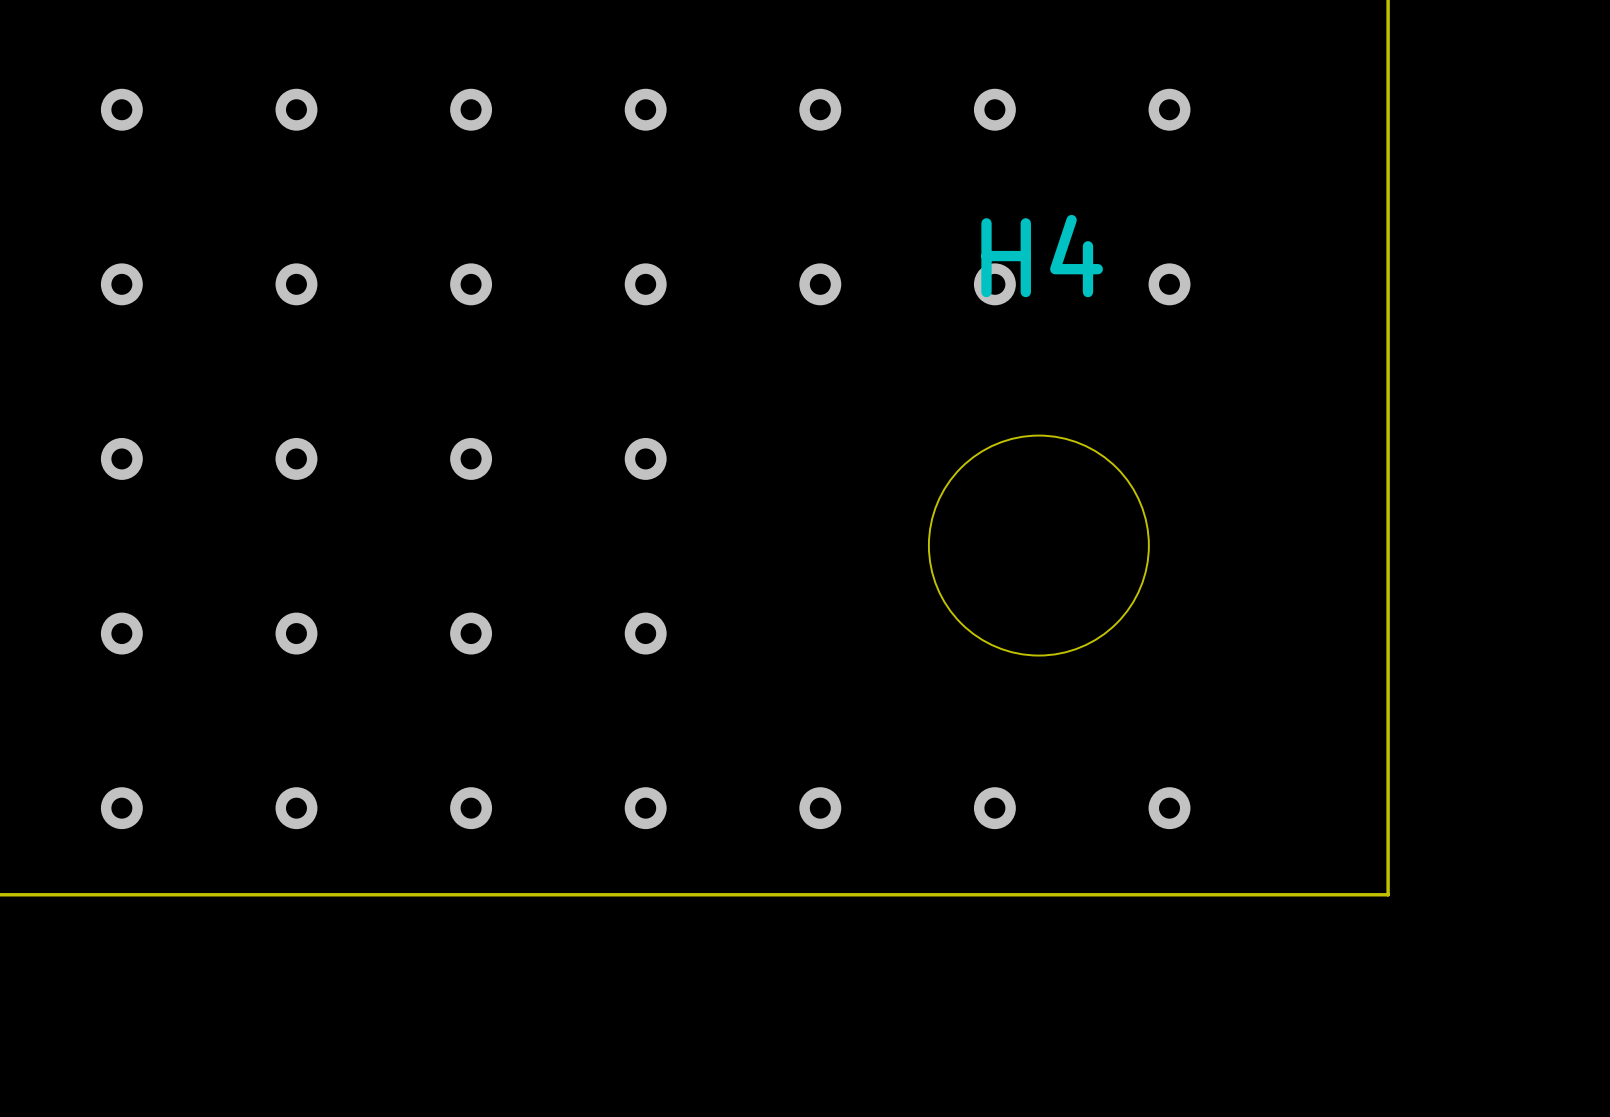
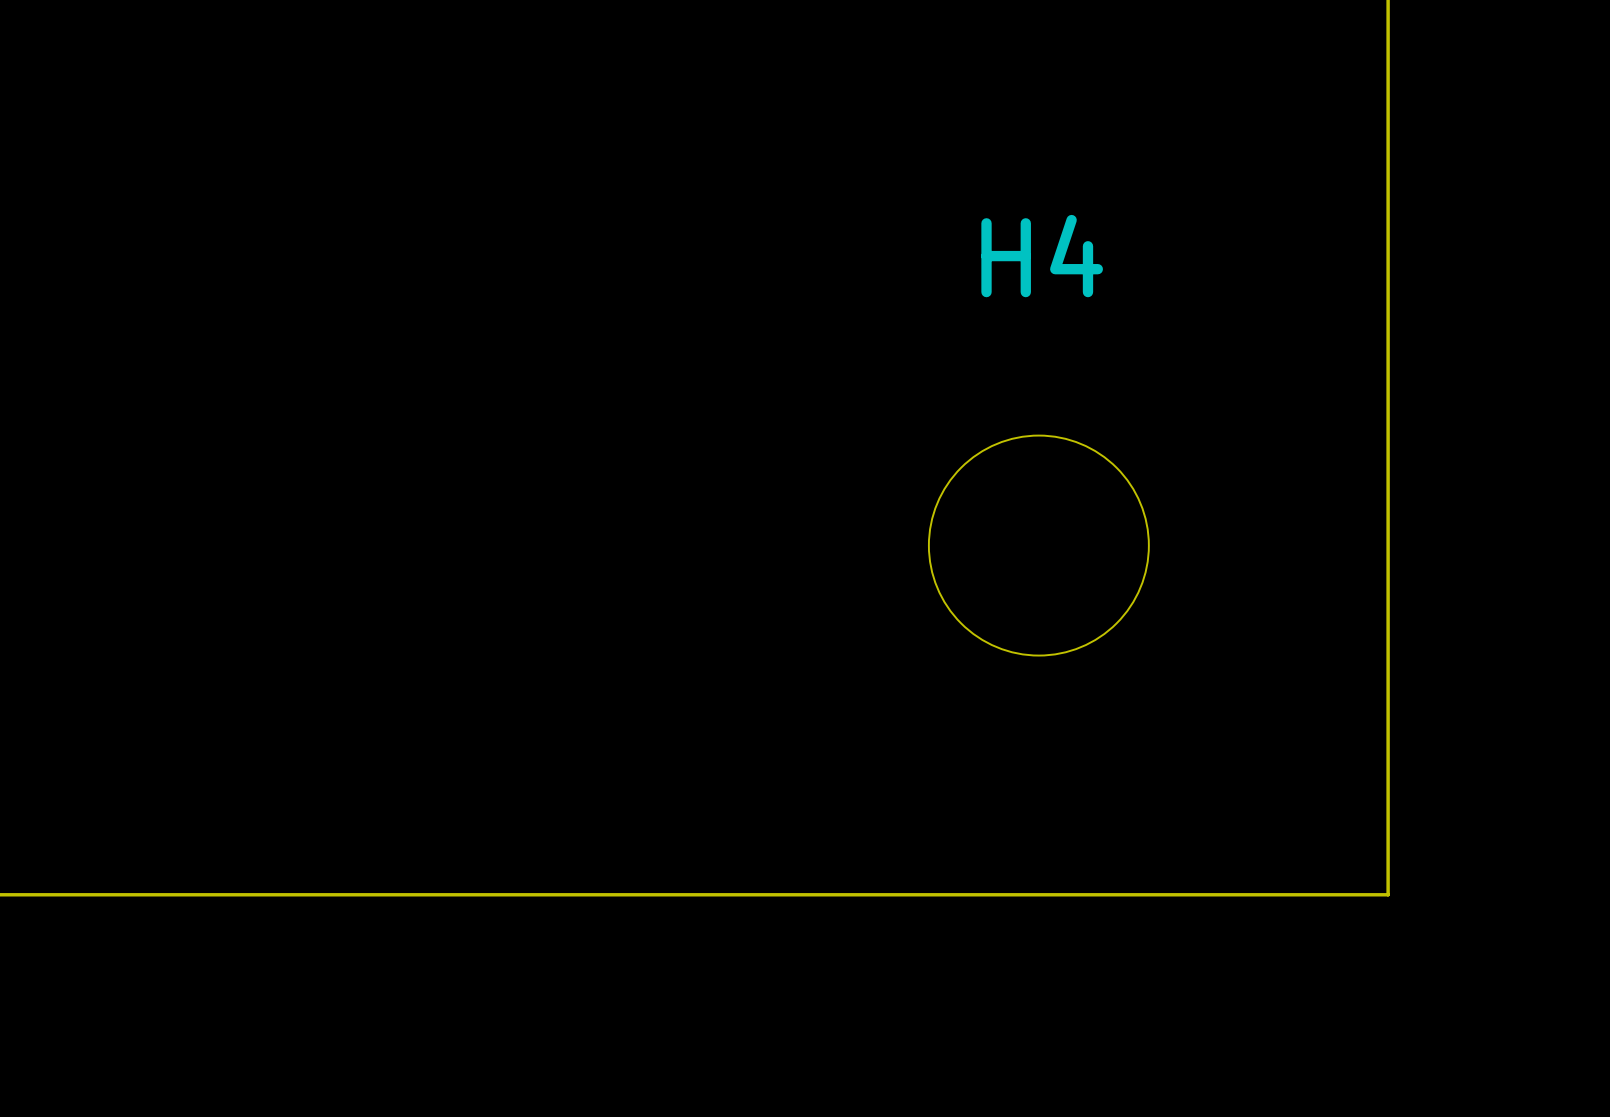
via: (121, 109) -> none
via: (296, 109) -> none
via: (471, 109) -> none
via: (645, 109) -> none
via: (820, 109) -> none
via: (994, 109) -> none
via: (1169, 109) -> none
via: (121, 284) -> none
via: (296, 284) -> none
via: (471, 284) -> none
via: (645, 284) -> none
via: (820, 284) -> none
via: (994, 284) -> none
via: (1169, 284) -> none
via: (121, 458) -> none
via: (296, 458) -> none
via: (471, 458) -> none
via: (645, 458) -> none
via: (121, 633) -> none
via: (296, 633) -> none
via: (471, 633) -> none
via: (645, 633) -> none
via: (121, 808) -> none
via: (296, 808) -> none
via: (471, 808) -> none
via: (645, 808) -> none
via: (820, 808) -> none
via: (994, 808) -> none
via: (1169, 808) -> none

